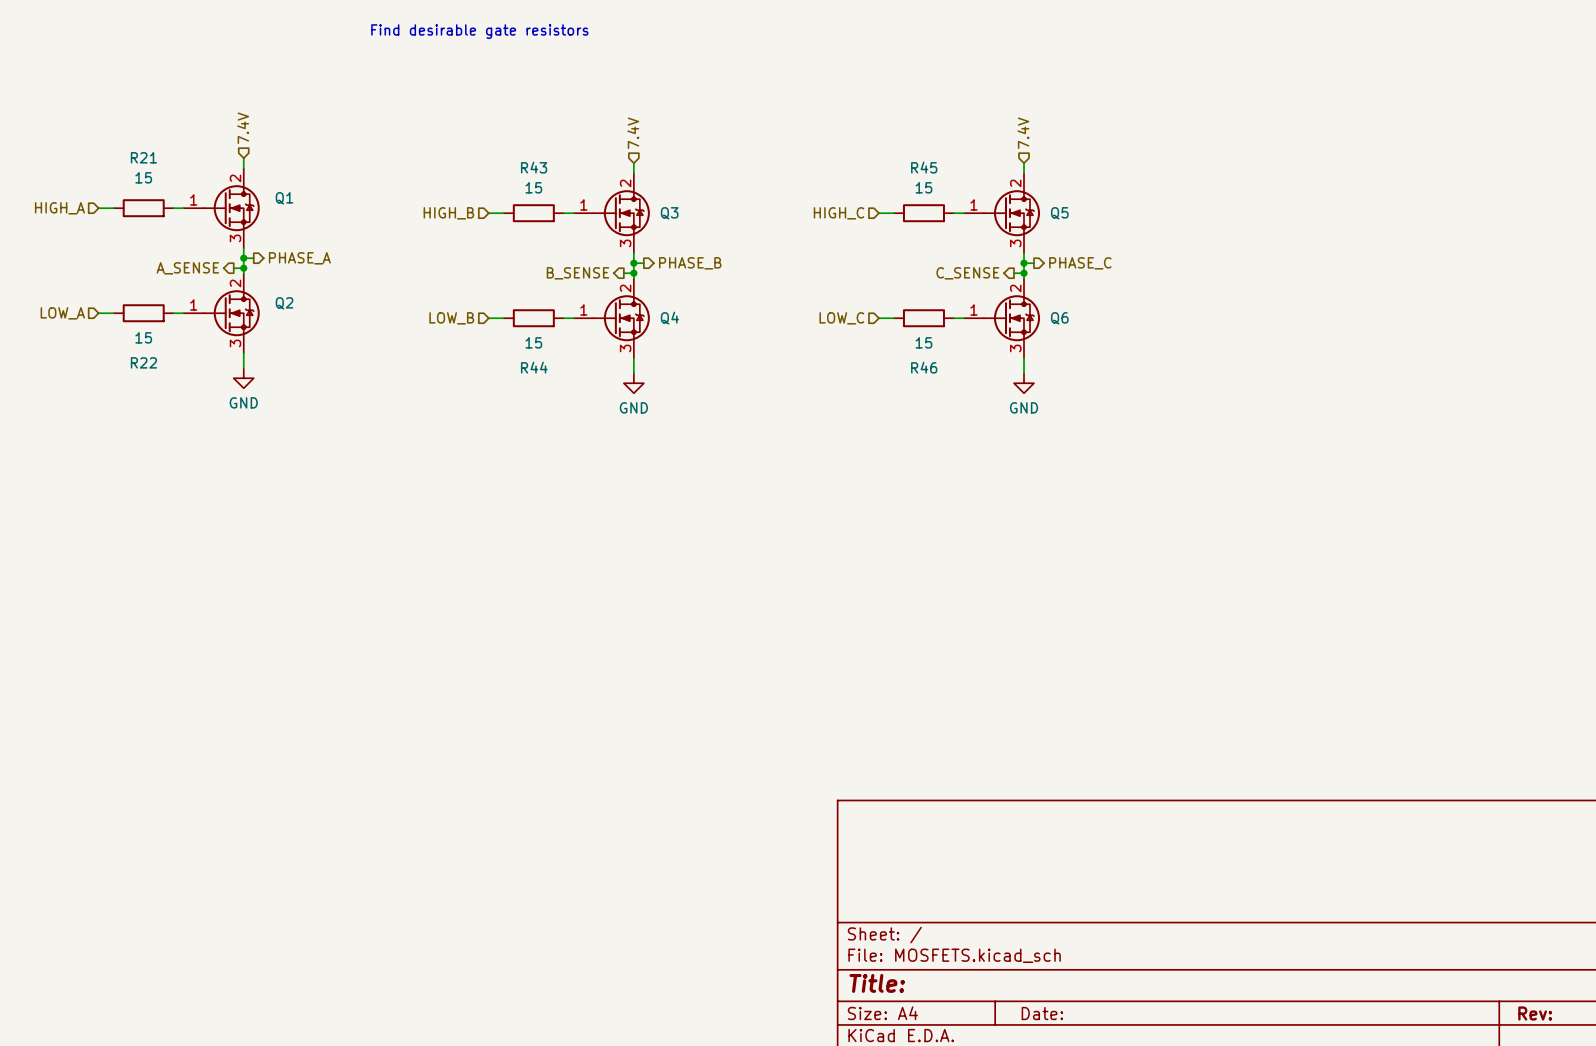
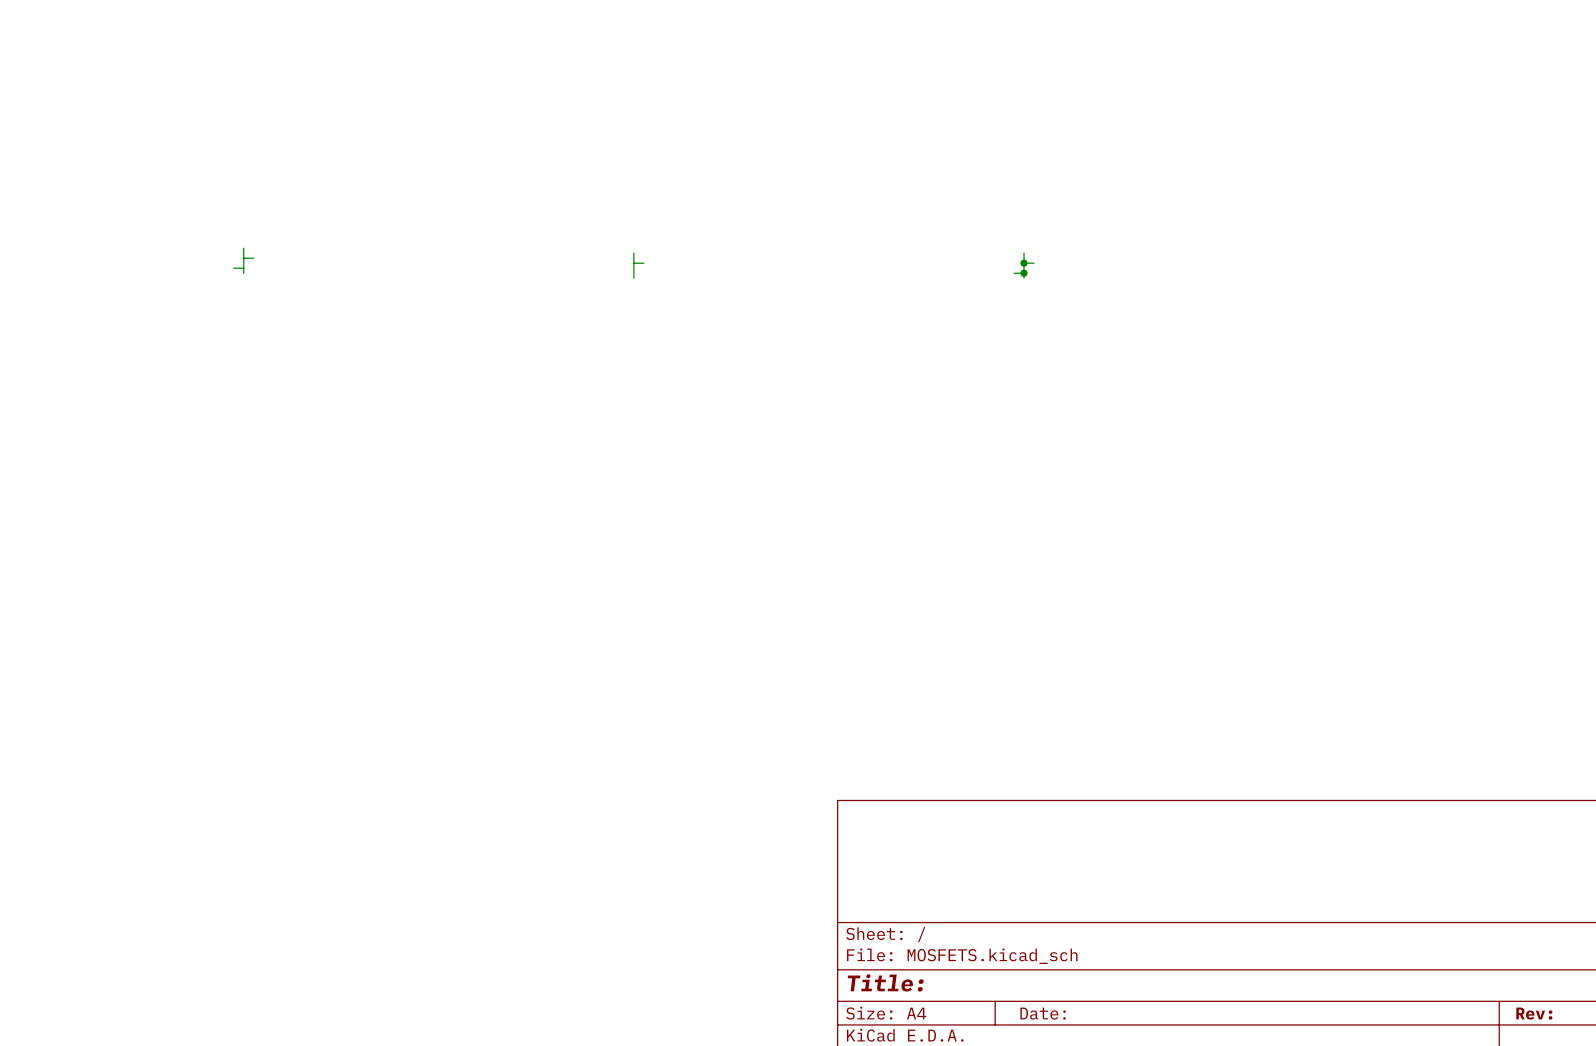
text: Find desirable gate resistors (479, 31) -> none
hierarchical label: 7.4V (243, 128) -> none
hierarchical label: 7.4V (633, 133) -> none
hierarchical label: 7.4V (1023, 133) -> none
wire: (243, 158) (243, 168) -> none
wire: (633, 163) (633, 173) -> none
wire: (1024, 163) (1024, 173) -> none
hierarchical label: HIGH_A (59, 208) -> none
wire: (98, 208) (113, 208) -> none
R21: 15 (143, 208) -> none
wire: (173, 208) (183, 208) -> none
Q1: (221, 208) -> none
hierarchical label: HIGH_B (448, 213) -> none
wire: (488, 213) (503, 213) -> none
R43: 15 (533, 213) -> none
wire: (563, 213) (573, 213) -> none
Q3: (611, 213) -> none
hierarchical label: HIGH_C (839, 213) -> none
wire: (878, 213) (893, 213) -> none
R45: 15 (923, 213) -> none
wire: (953, 213) (963, 213) -> none
Q5: (1001, 213) -> none
junction: (243, 258) -> none
hierarchical label: PHASE_A (299, 258) -> none
junction: (633, 263) -> none
hierarchical label: PHASE_B (690, 263) -> none
hierarchical label: PHASE_C (1080, 263) -> none
hierarchical label: A_SENSE (187, 268) -> none
junction: (243, 268) -> none
hierarchical label: B_SENSE (577, 273) -> none
wire: (623, 273) (633, 273) -> none
junction: (633, 273) -> none
hierarchical label: C_SENSE (967, 273) -> none
hierarchical label: LOW_A (62, 313) -> none
wire: (98, 313) (113, 313) -> none
R22: 15 (143, 313) -> none
wire: (173, 313) (183, 313) -> none
Q2: (221, 313) -> none
hierarchical label: LOW_B (451, 318) -> none
wire: (488, 318) (503, 318) -> none
R44: 15 (533, 318) -> none
wire: (563, 318) (573, 318) -> none
Q4: (611, 318) -> none
hierarchical label: LOW_C (841, 318) -> none
wire: (878, 318) (893, 318) -> none
R46: 15 (923, 318) -> none
wire: (953, 318) (963, 318) -> none
Q6: (1001, 318) -> none
wire: (243, 353) (243, 368) -> none
wire: (633, 358) (633, 373) -> none
wire: (1024, 358) (1024, 373) -> none
power symbol: GND (243, 378) -> none
power symbol: GND (633, 383) -> none
power symbol: GND (1024, 383) -> none

